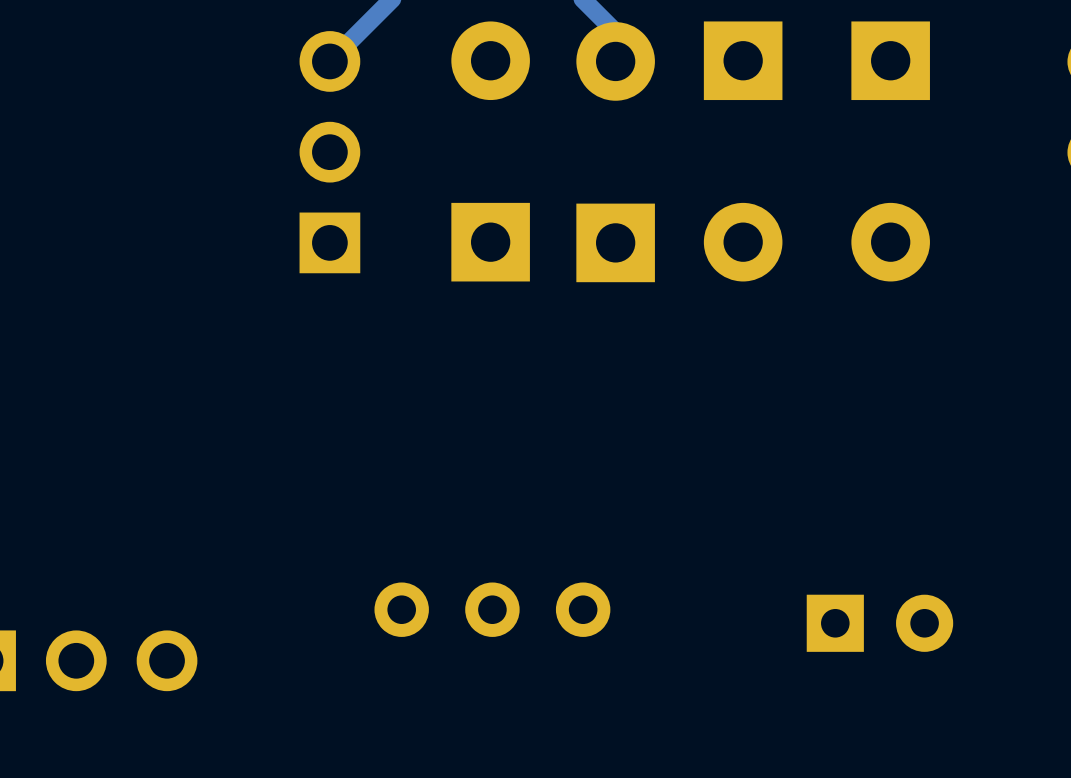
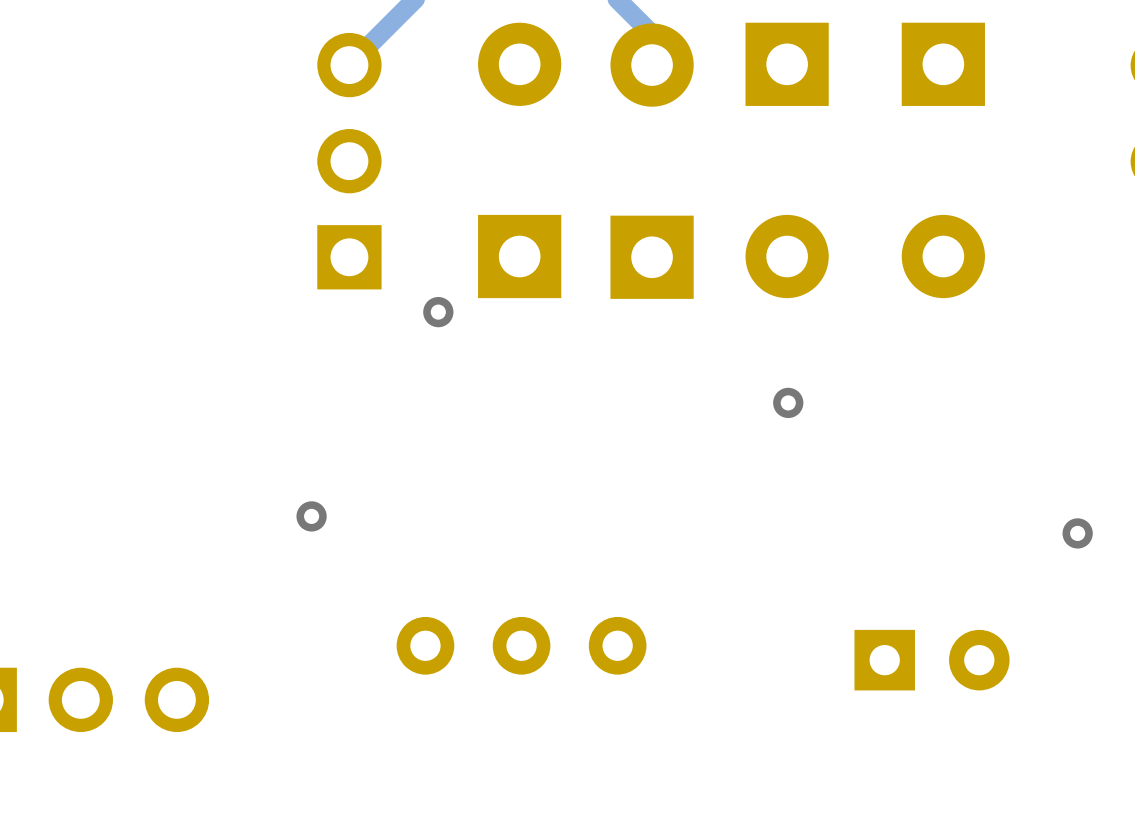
via: none -> (438, 312)
via: none -> (788, 402)
via: none -> (311, 516)
via: none -> (1077, 533)

